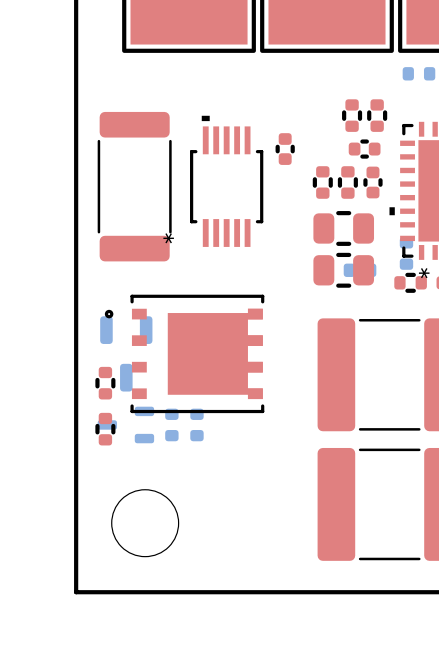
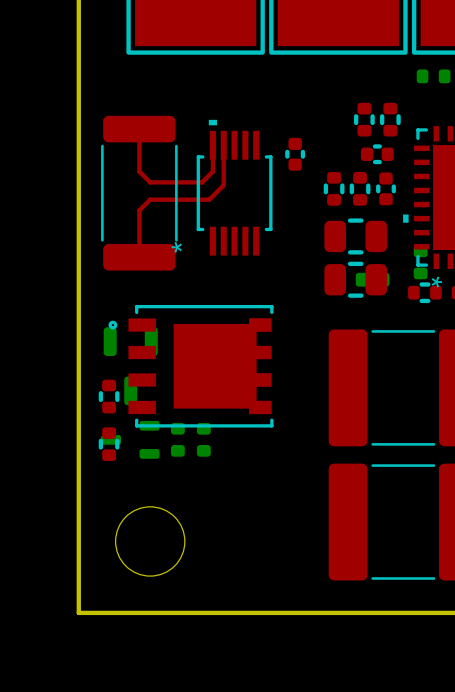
top track: none -> (139, 129) (139, 171) (150, 182) (202, 182) (212, 171) (212, 145)
top track: none -> (223, 145) (223, 185) (209, 199) (150, 199) (139, 210) (139, 257)
part footprint: [104, 294, 265, 414] -> [108, 305, 274, 428]

